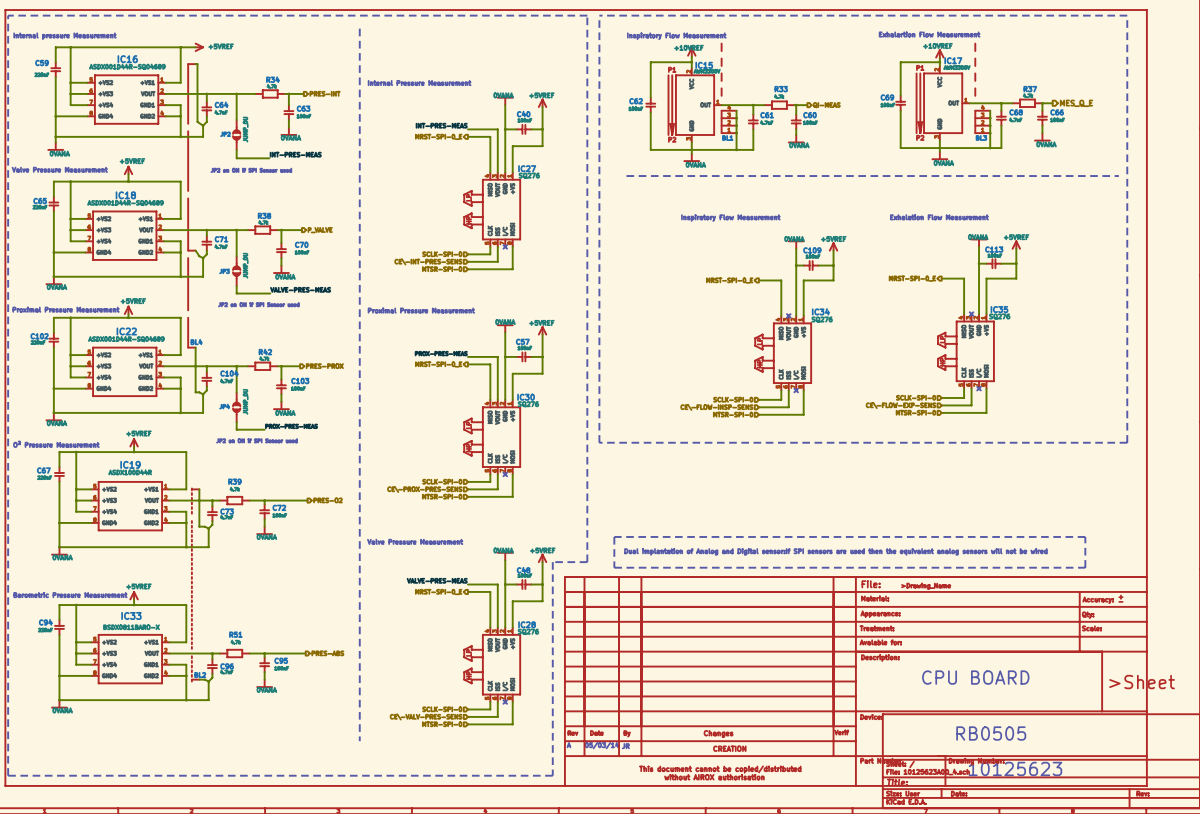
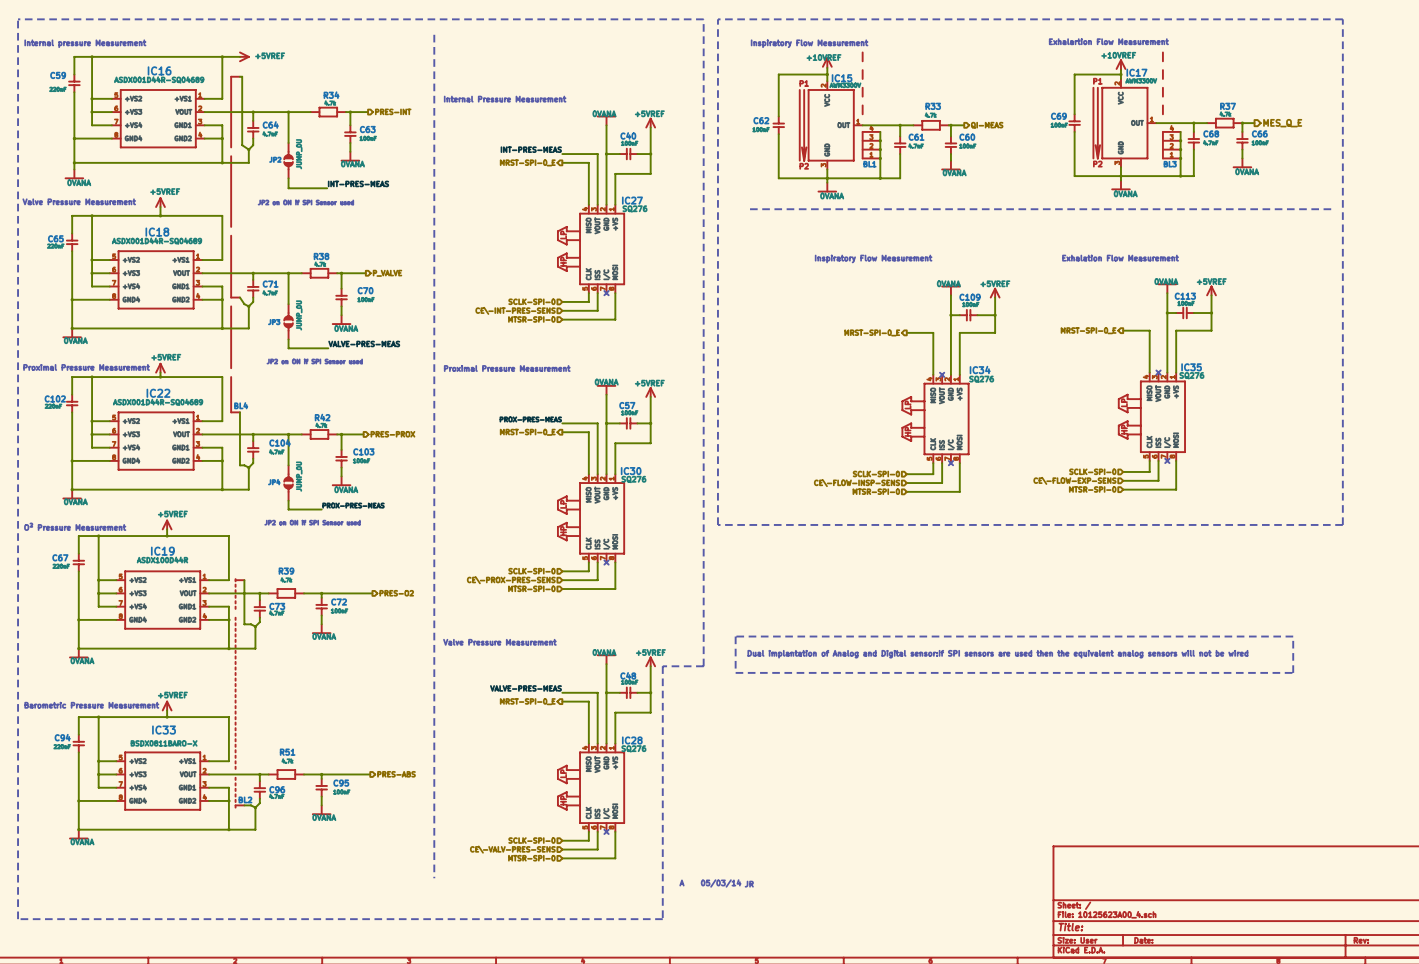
drawing: [5, 10, 1147, 786] -> none
text: CPU BOARD (975, 677) -> none
text: RB0505 (991, 733) -> none
text: 10125623 (1015, 768) -> none

